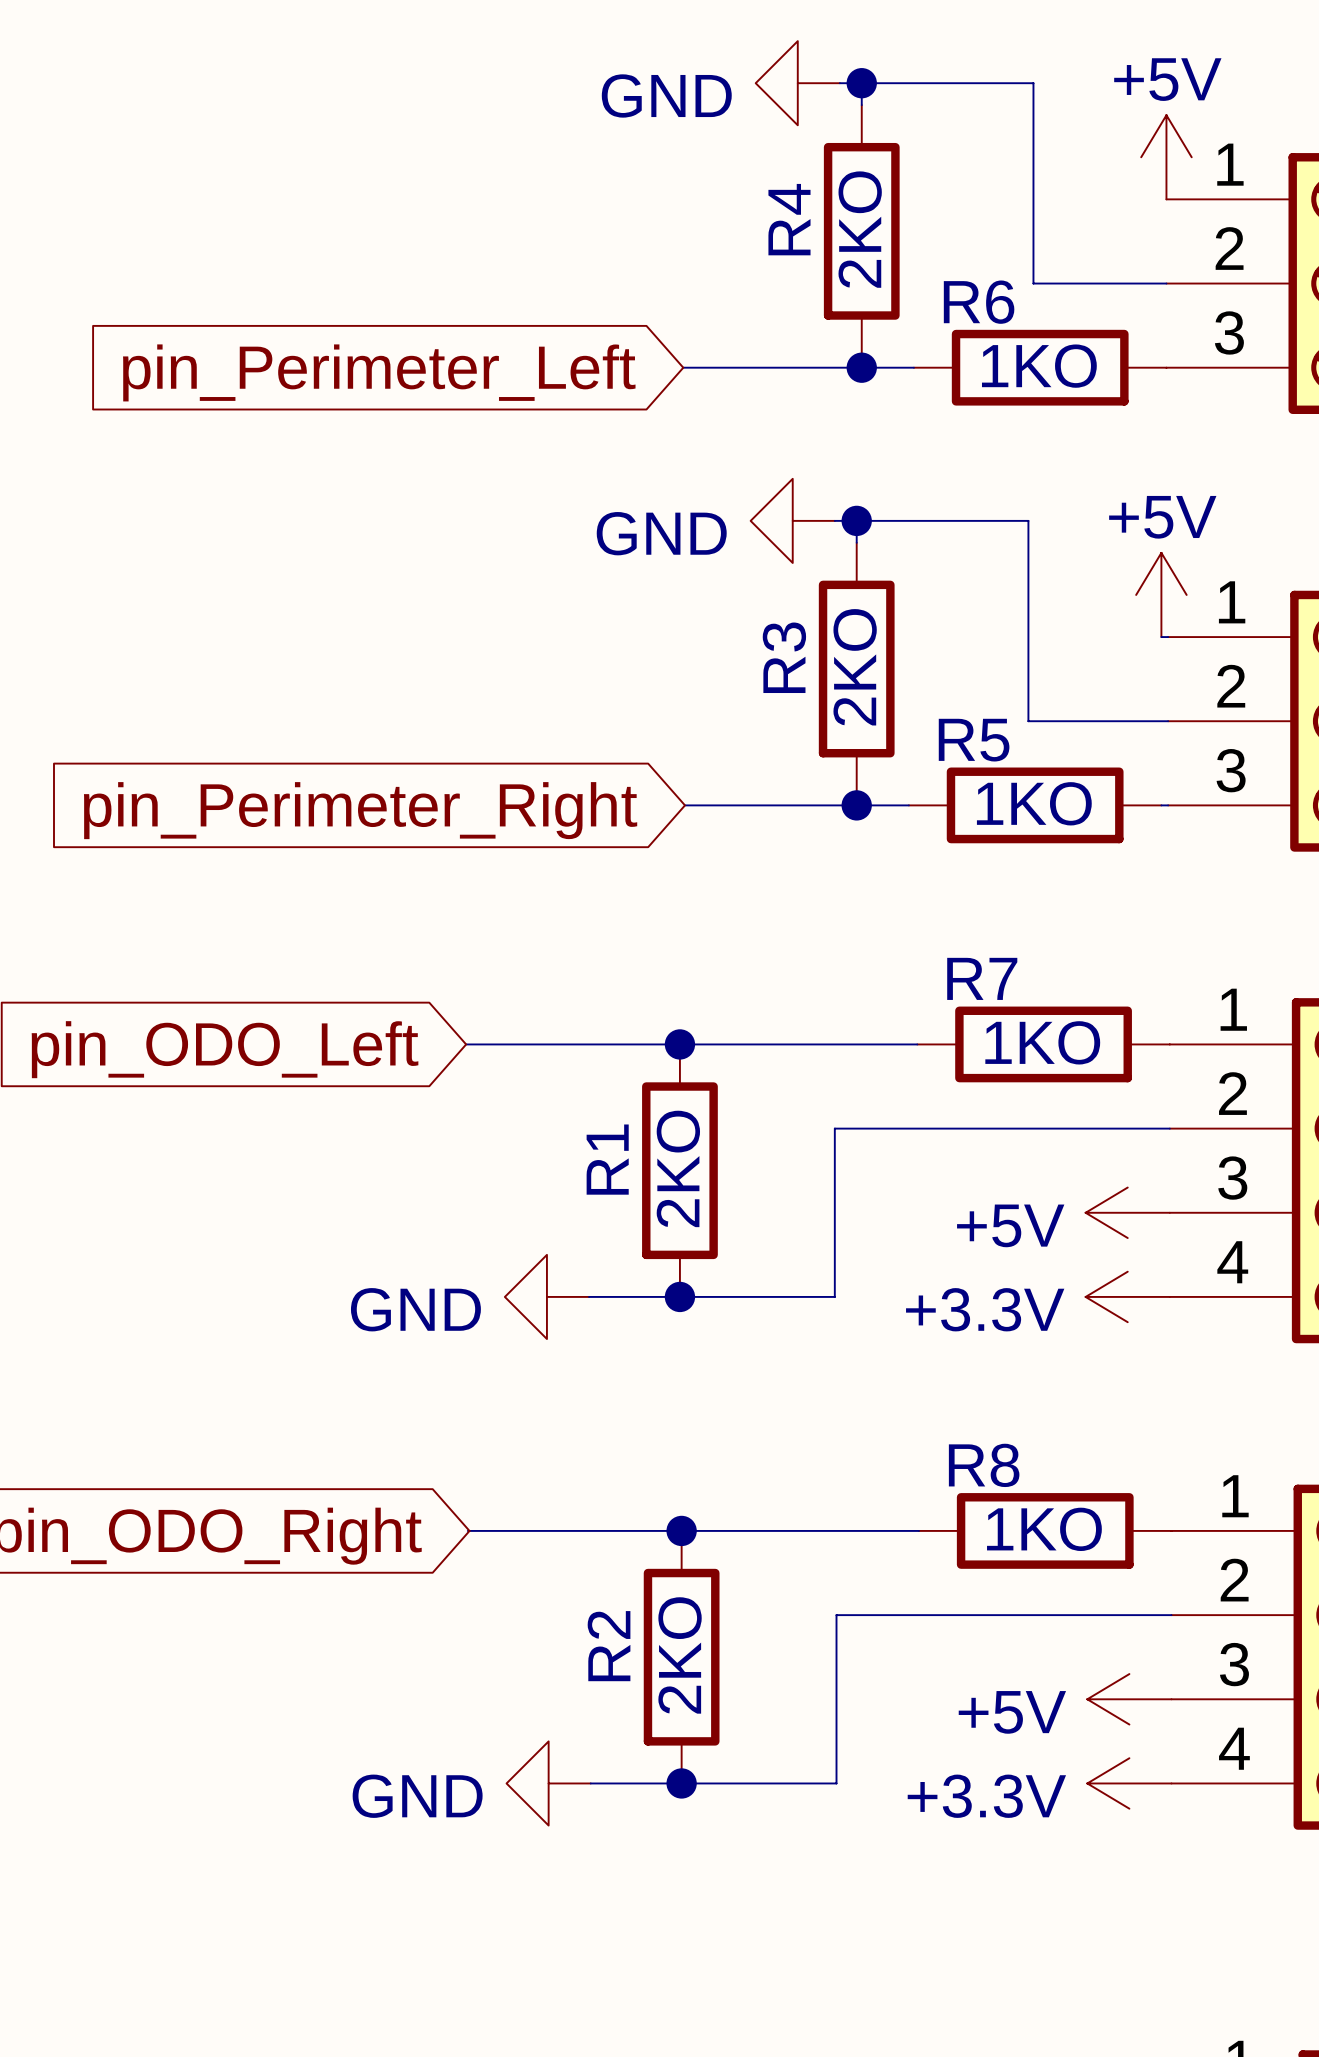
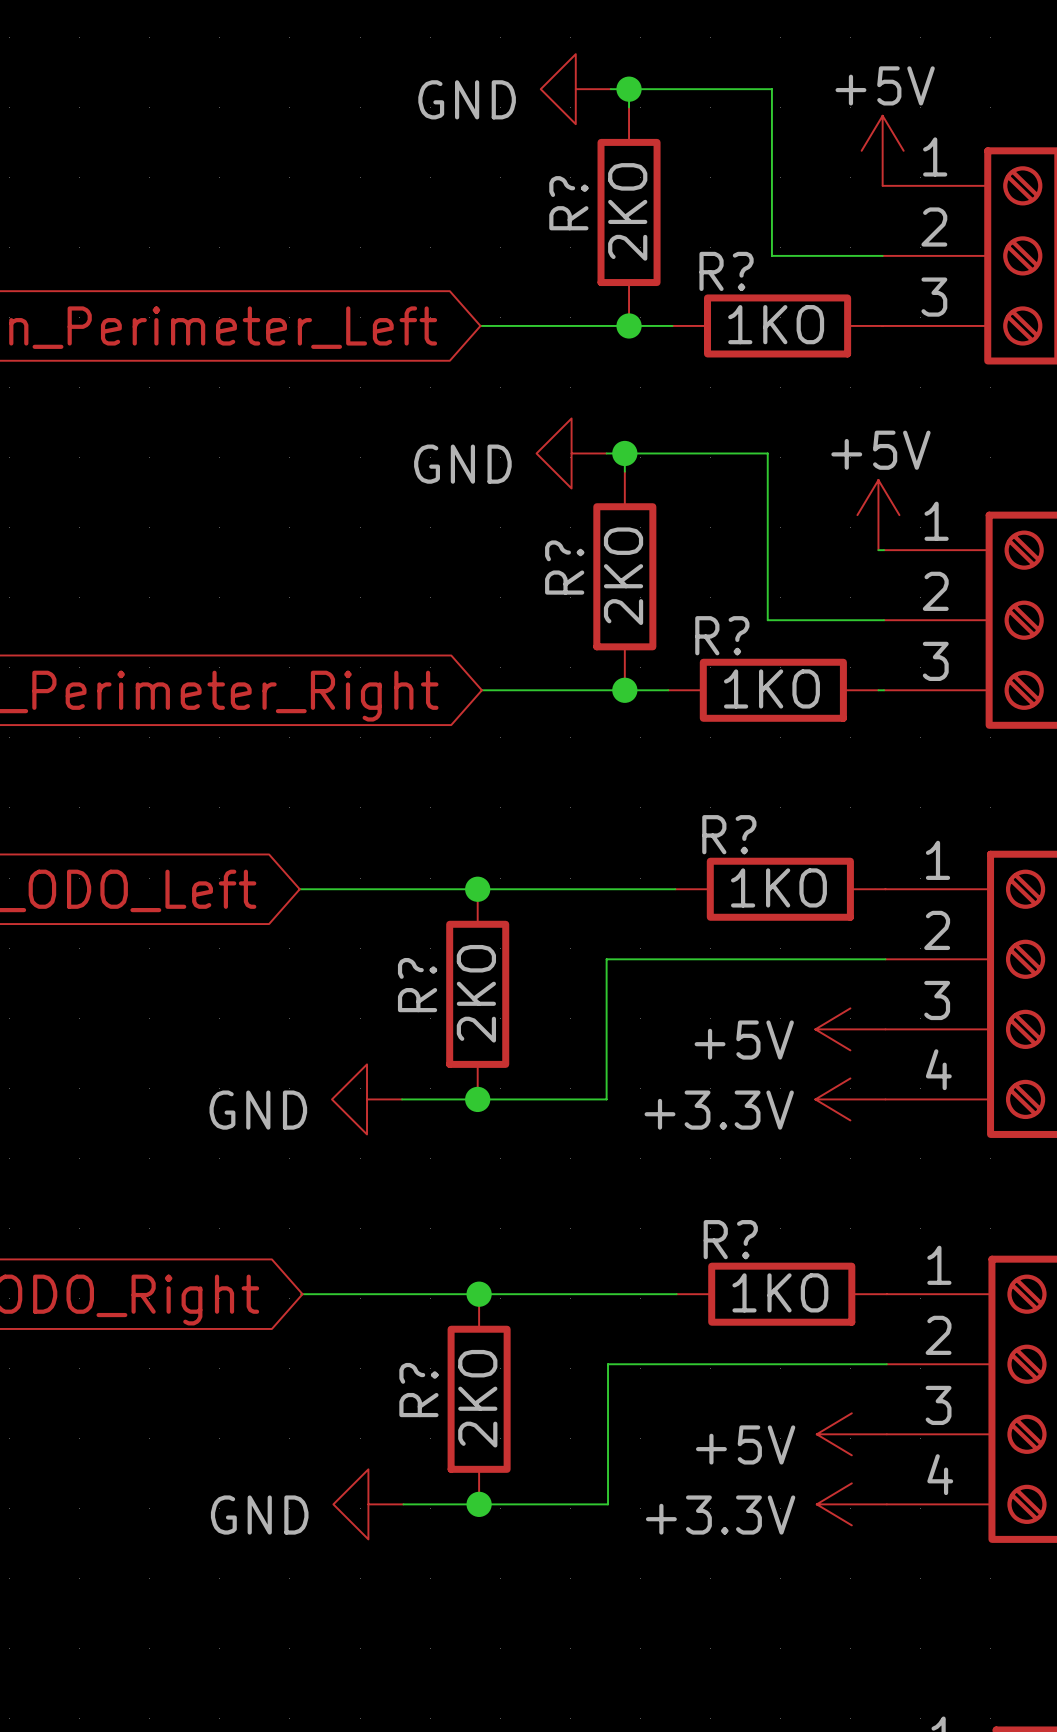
R4 name: R4 (789, 219) -> R? (568, 203)
R6 name: R6 (979, 302) -> R? (726, 271)
R3 name: R3 (784, 657) -> R? (564, 567)
R5 name: R5 (974, 740) -> R? (722, 635)
R7 name: R7 (982, 978) -> R? (729, 834)
R1 name: R1 (607, 1159) -> R? (417, 985)
R8 name: R8 (984, 1465) -> R? (730, 1239)
R2 name: R2 (609, 1646) -> R? (418, 1390)

